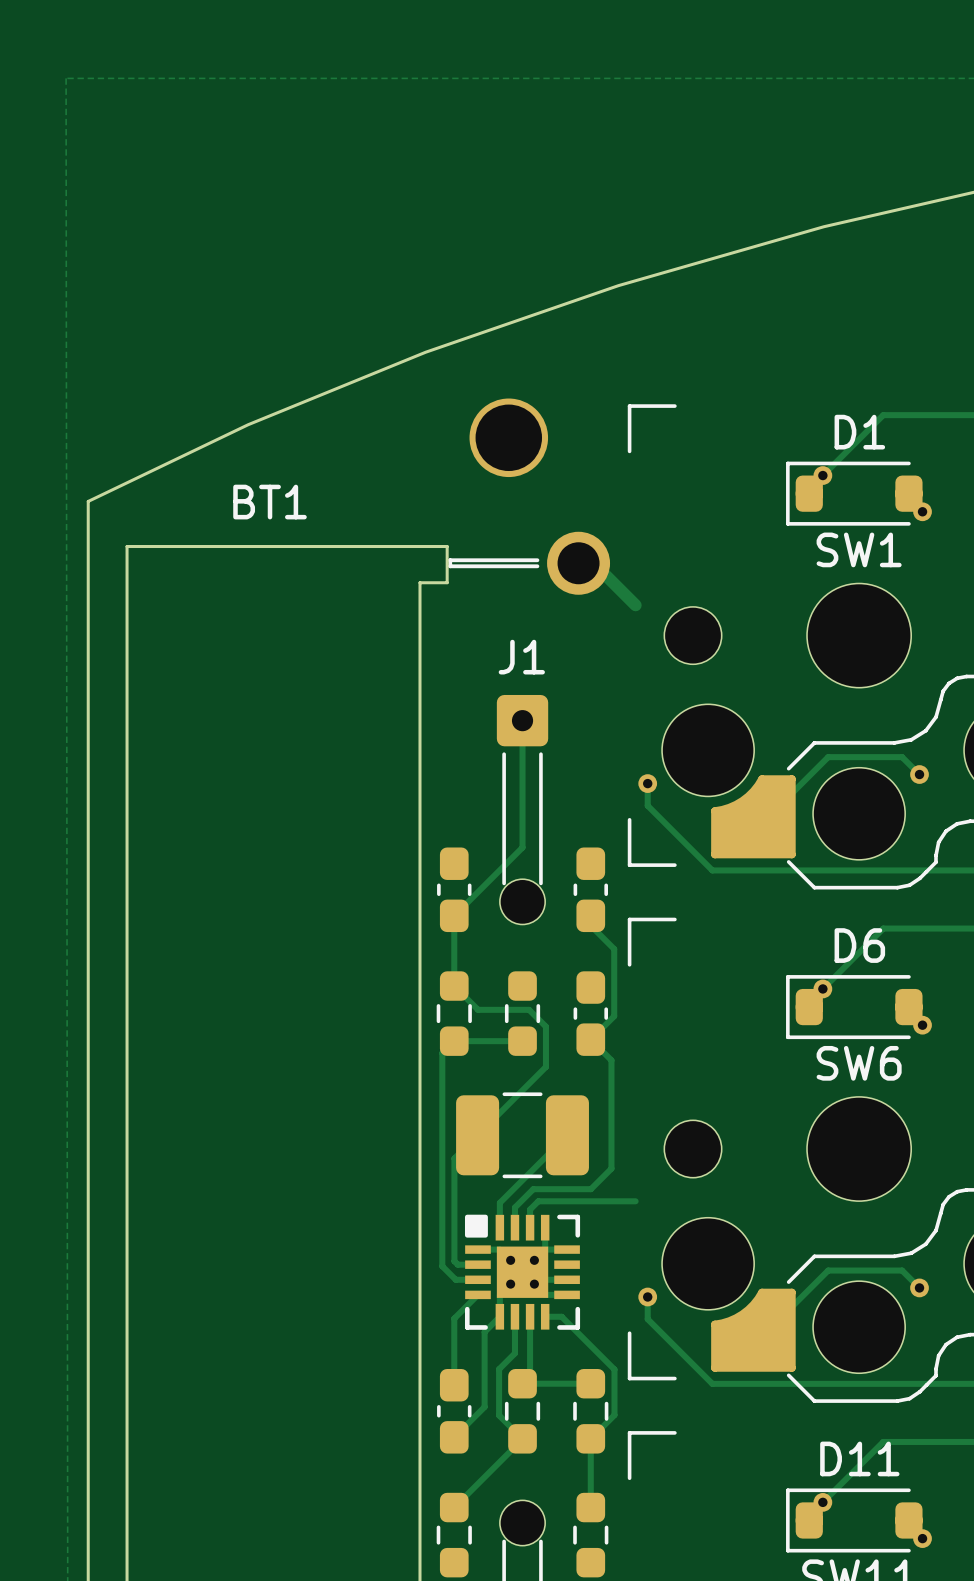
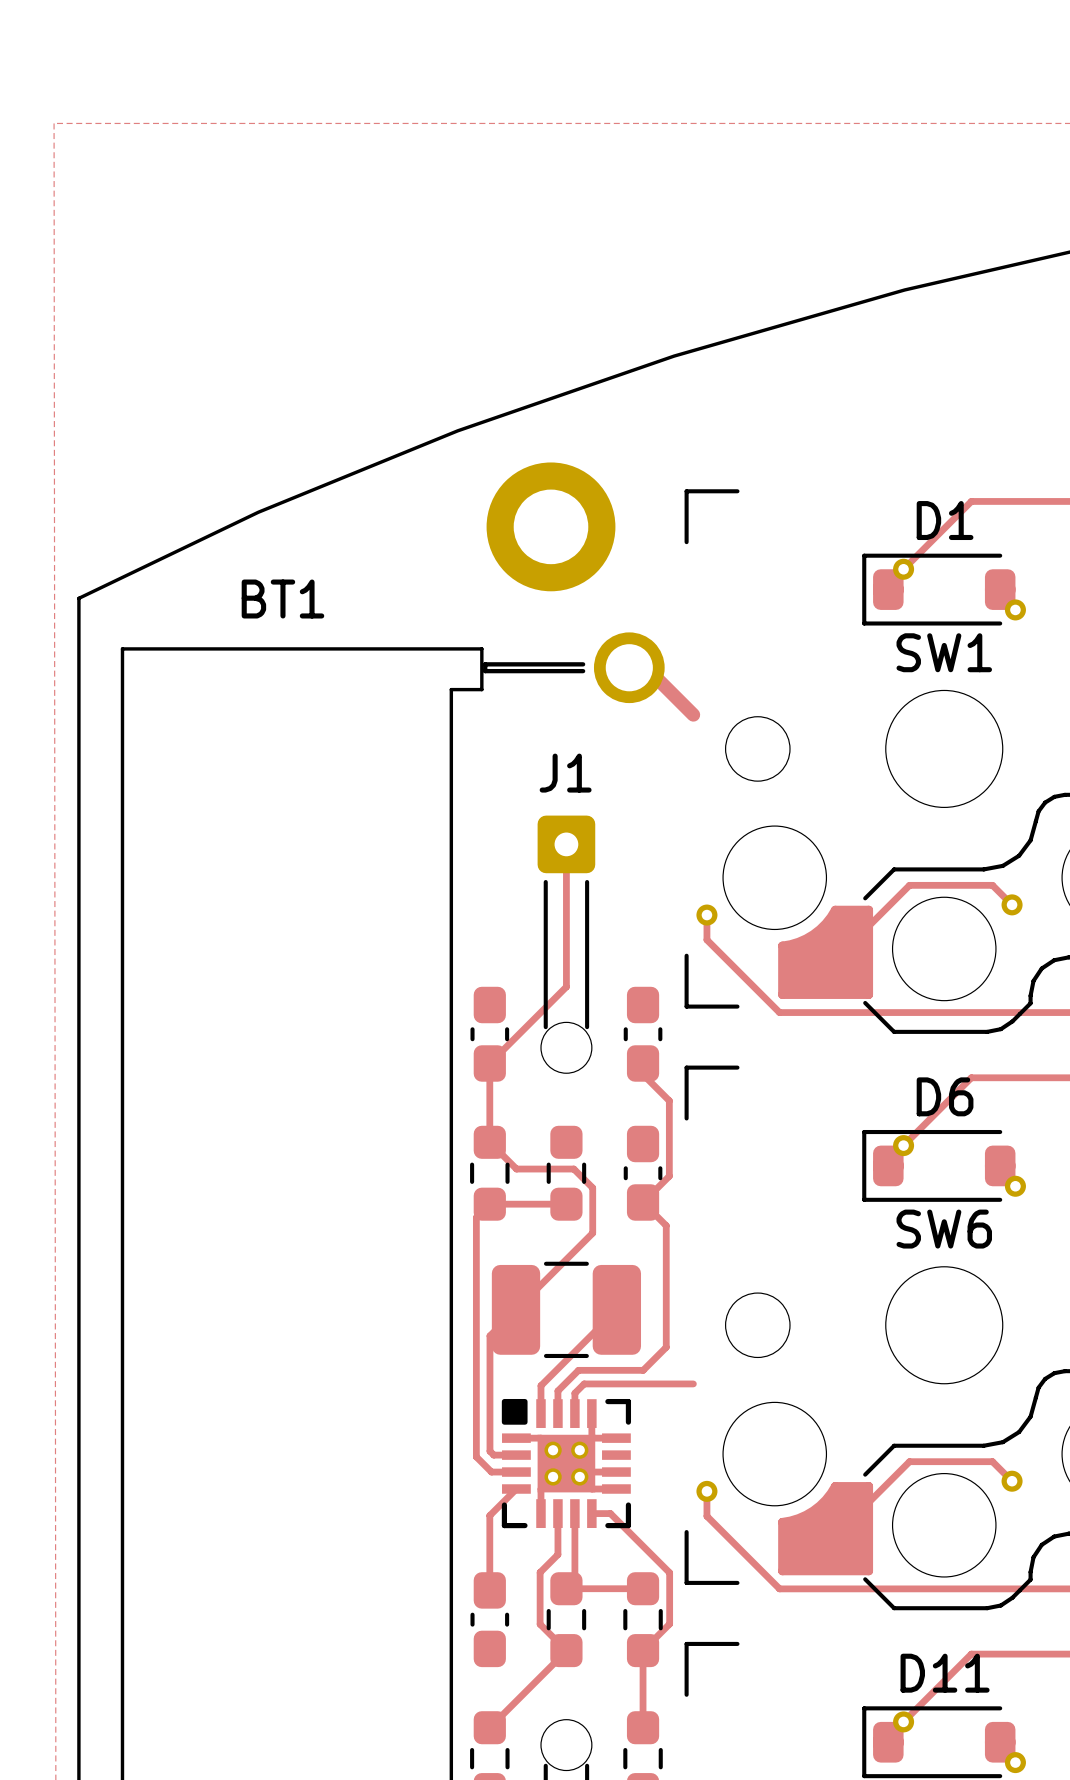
part footprint: [469, 398, 549, 478] -> [486, 462, 616, 592]
track: (499, 1316) (484, 1332) (484, 1406) (454, 1437) -> none

